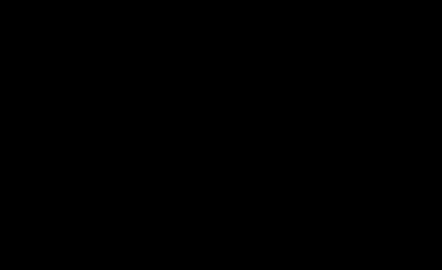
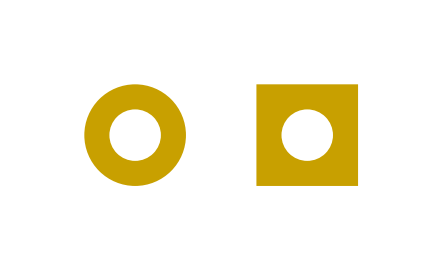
part: none -> (221, 135)

